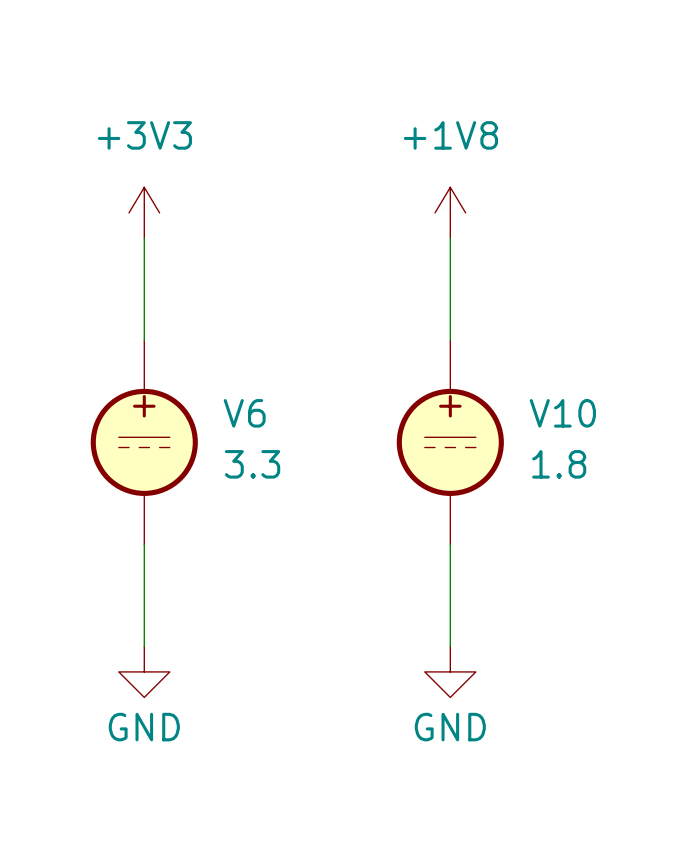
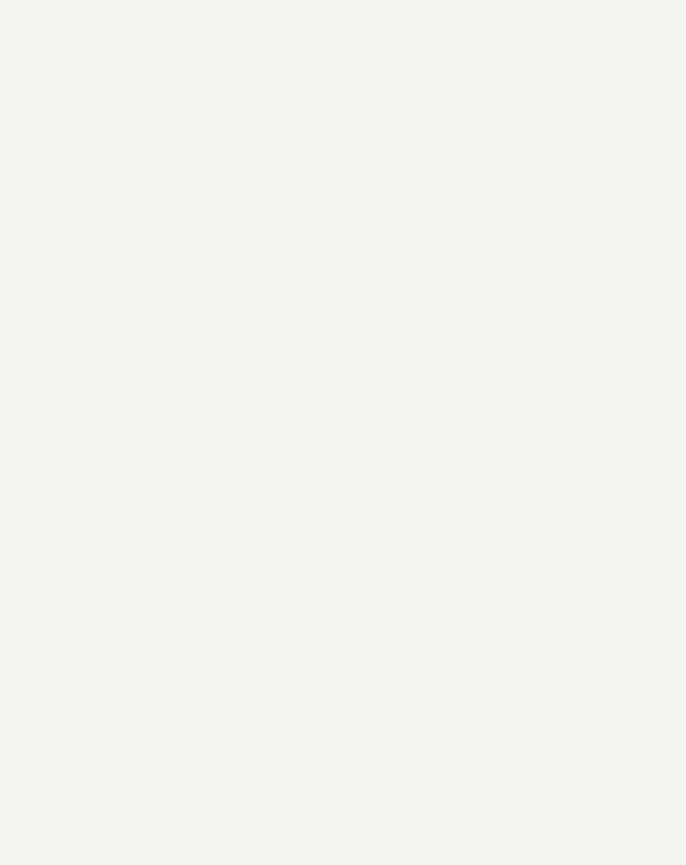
power symbol: +3V3 (144, 212) -> none
power symbol: +1V8 (450, 212) -> none
wire: (144, 238) (144, 340) -> none
wire: (450, 238) (450, 340) -> none
V6: 3.3 (144, 442) -> none
V10: 1.8 (450, 442) -> none
wire: (144, 544) (144, 646) -> none
wire: (450, 544) (450, 646) -> none
power symbol: GND (144, 671) -> none
power symbol: GND (450, 671) -> none

